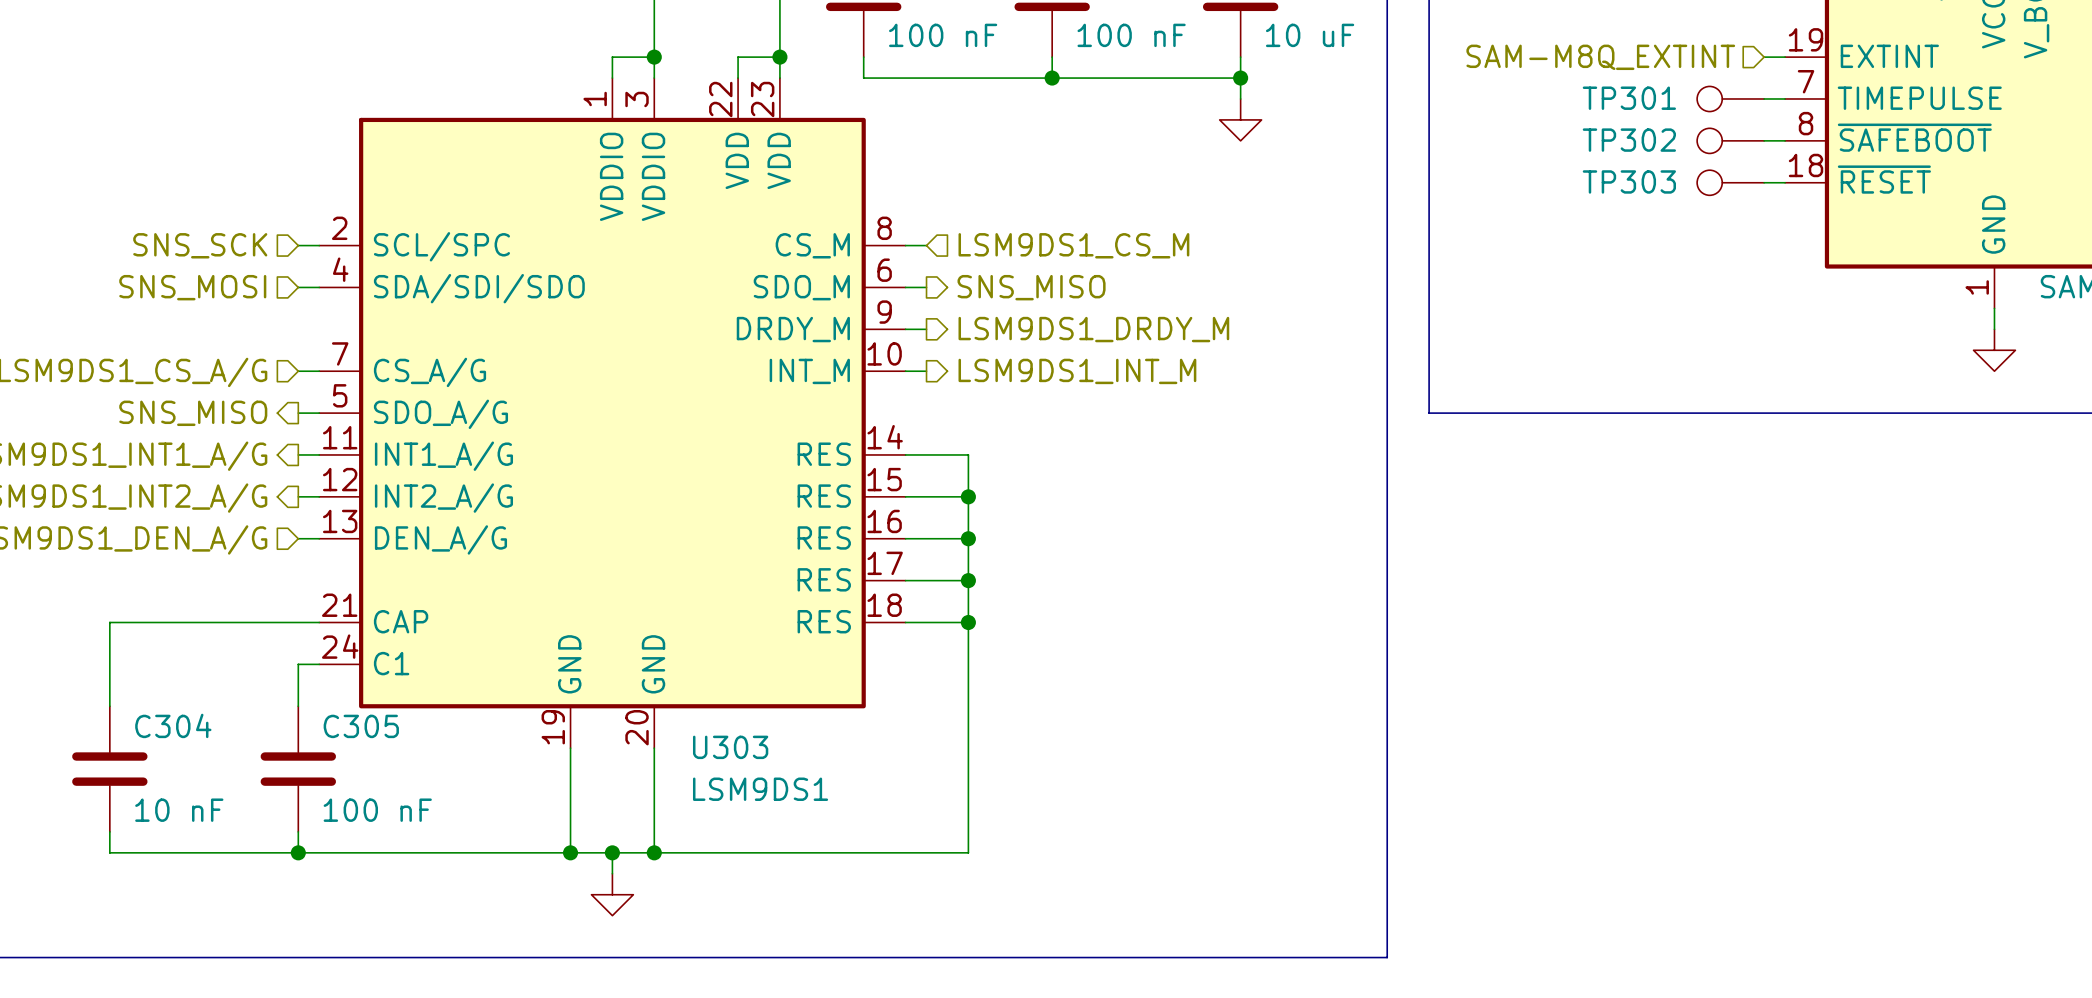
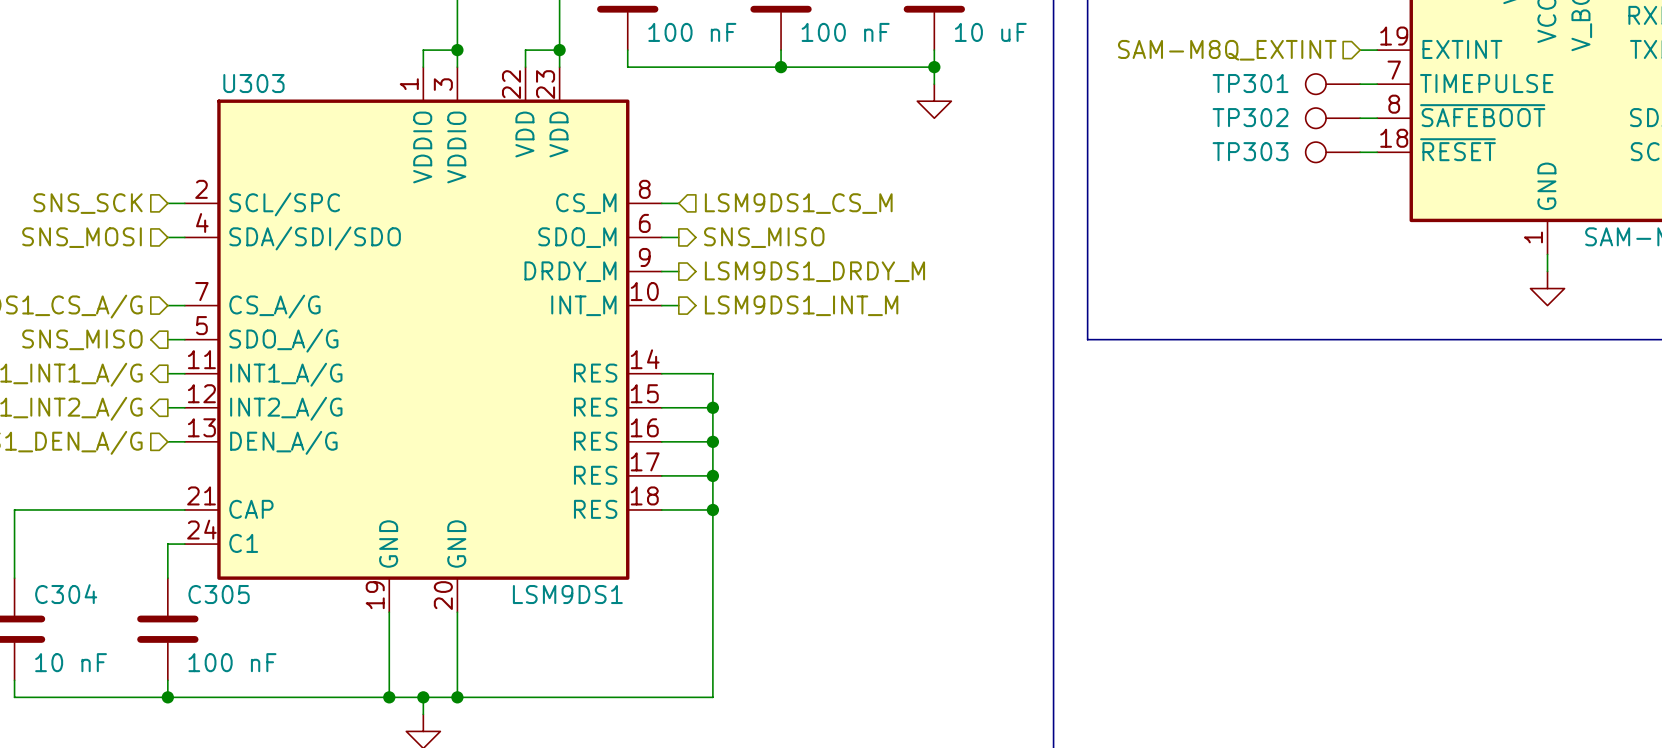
U303 name position: U303 (730, 747) -> U303 (253, 83)
U303 value position: LSM9DS1 (760, 789) -> LSM9DS1 (567, 594)

